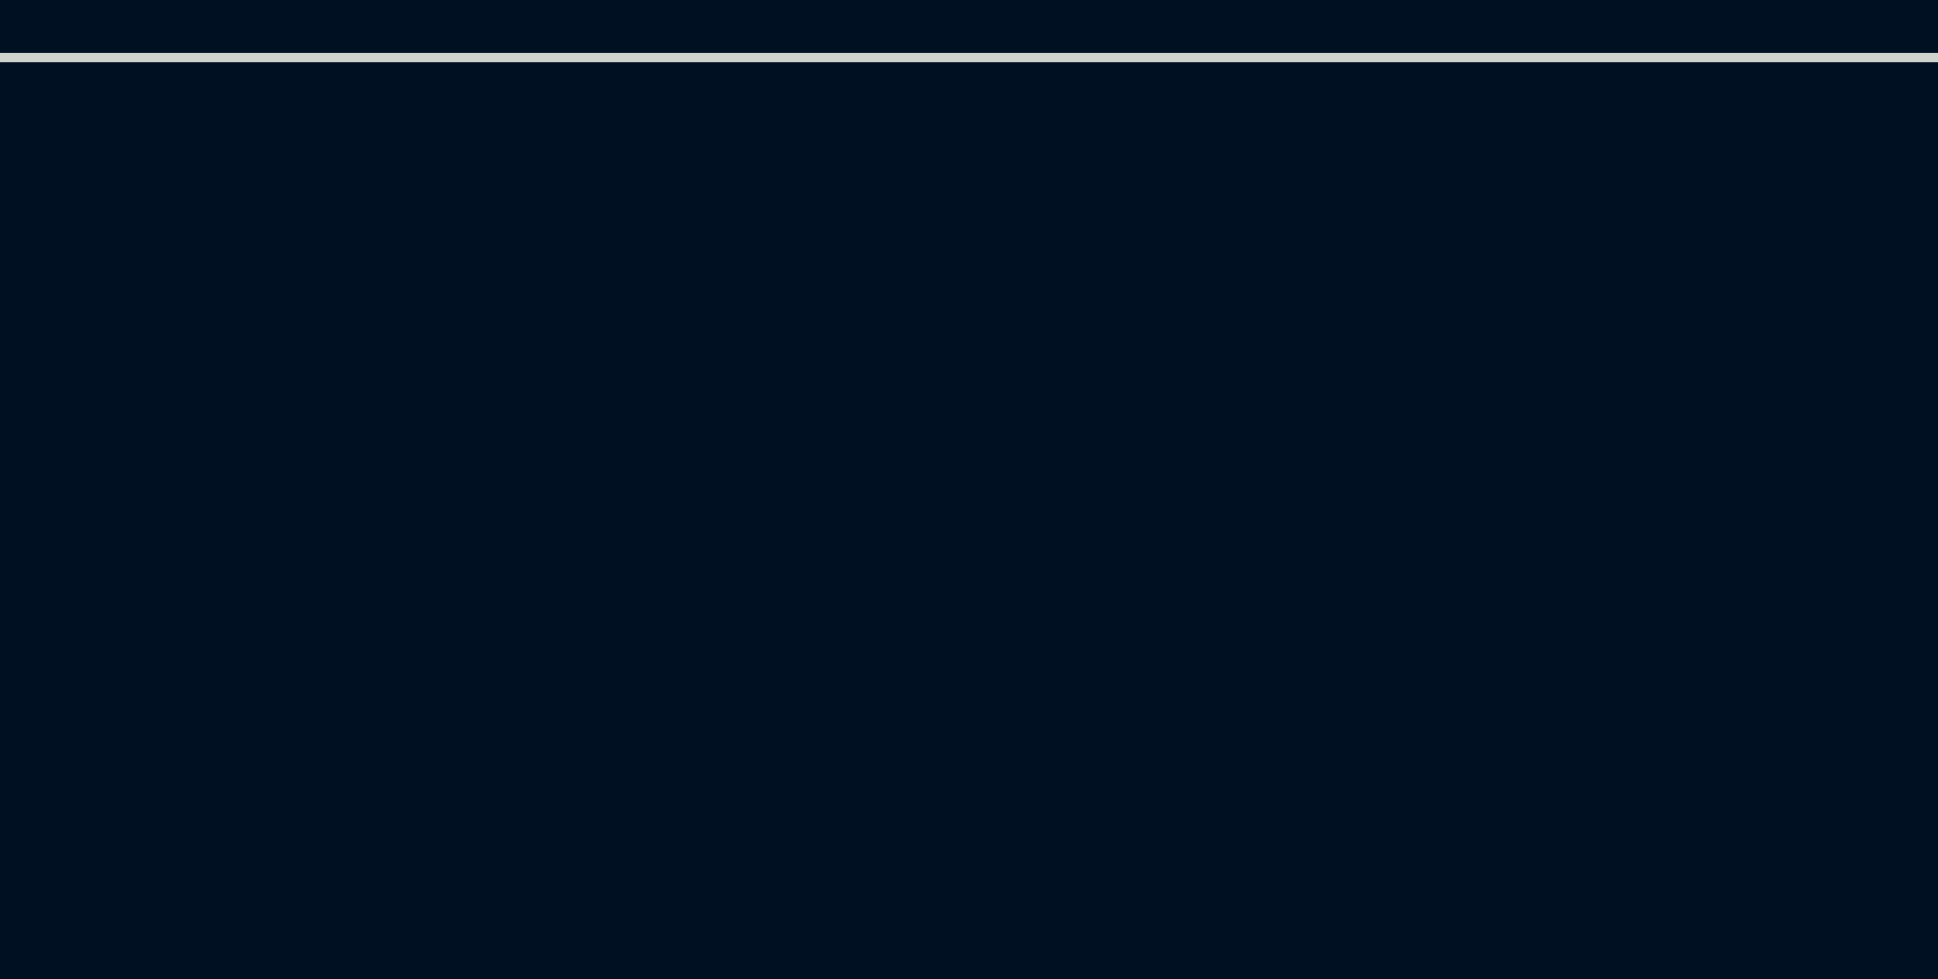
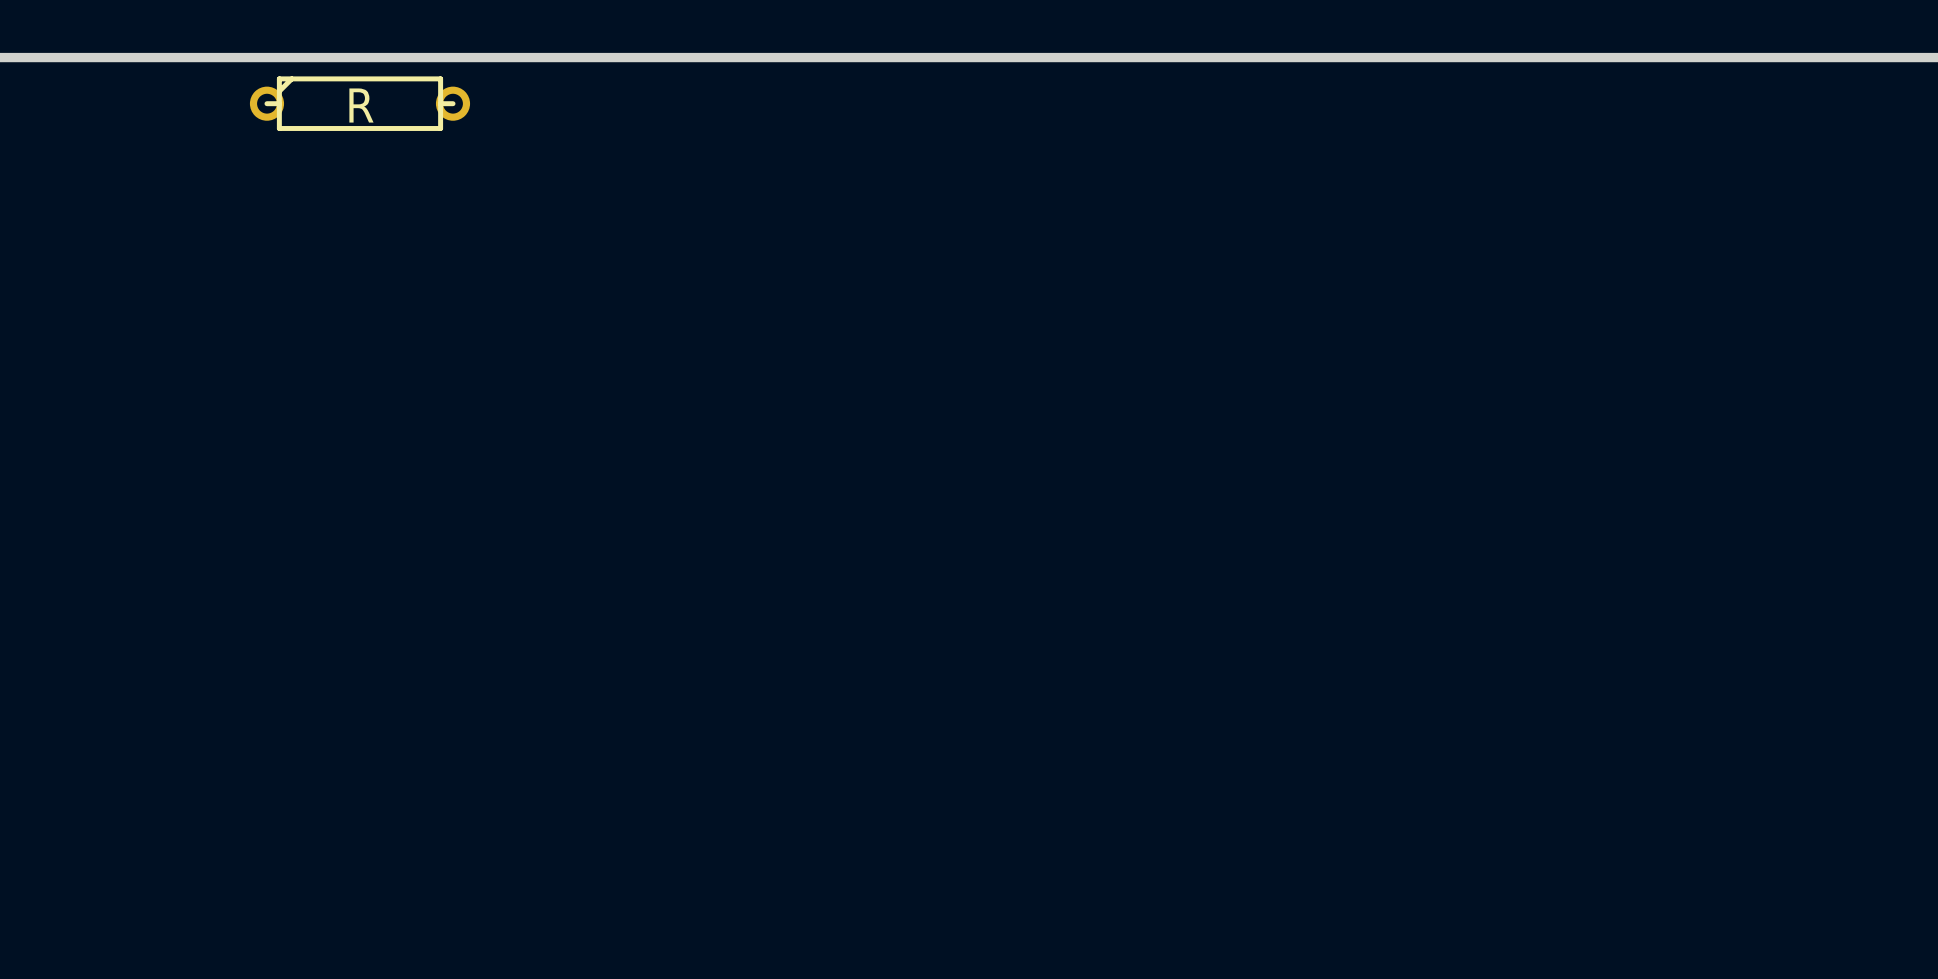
part: none -> R (359, 103)

